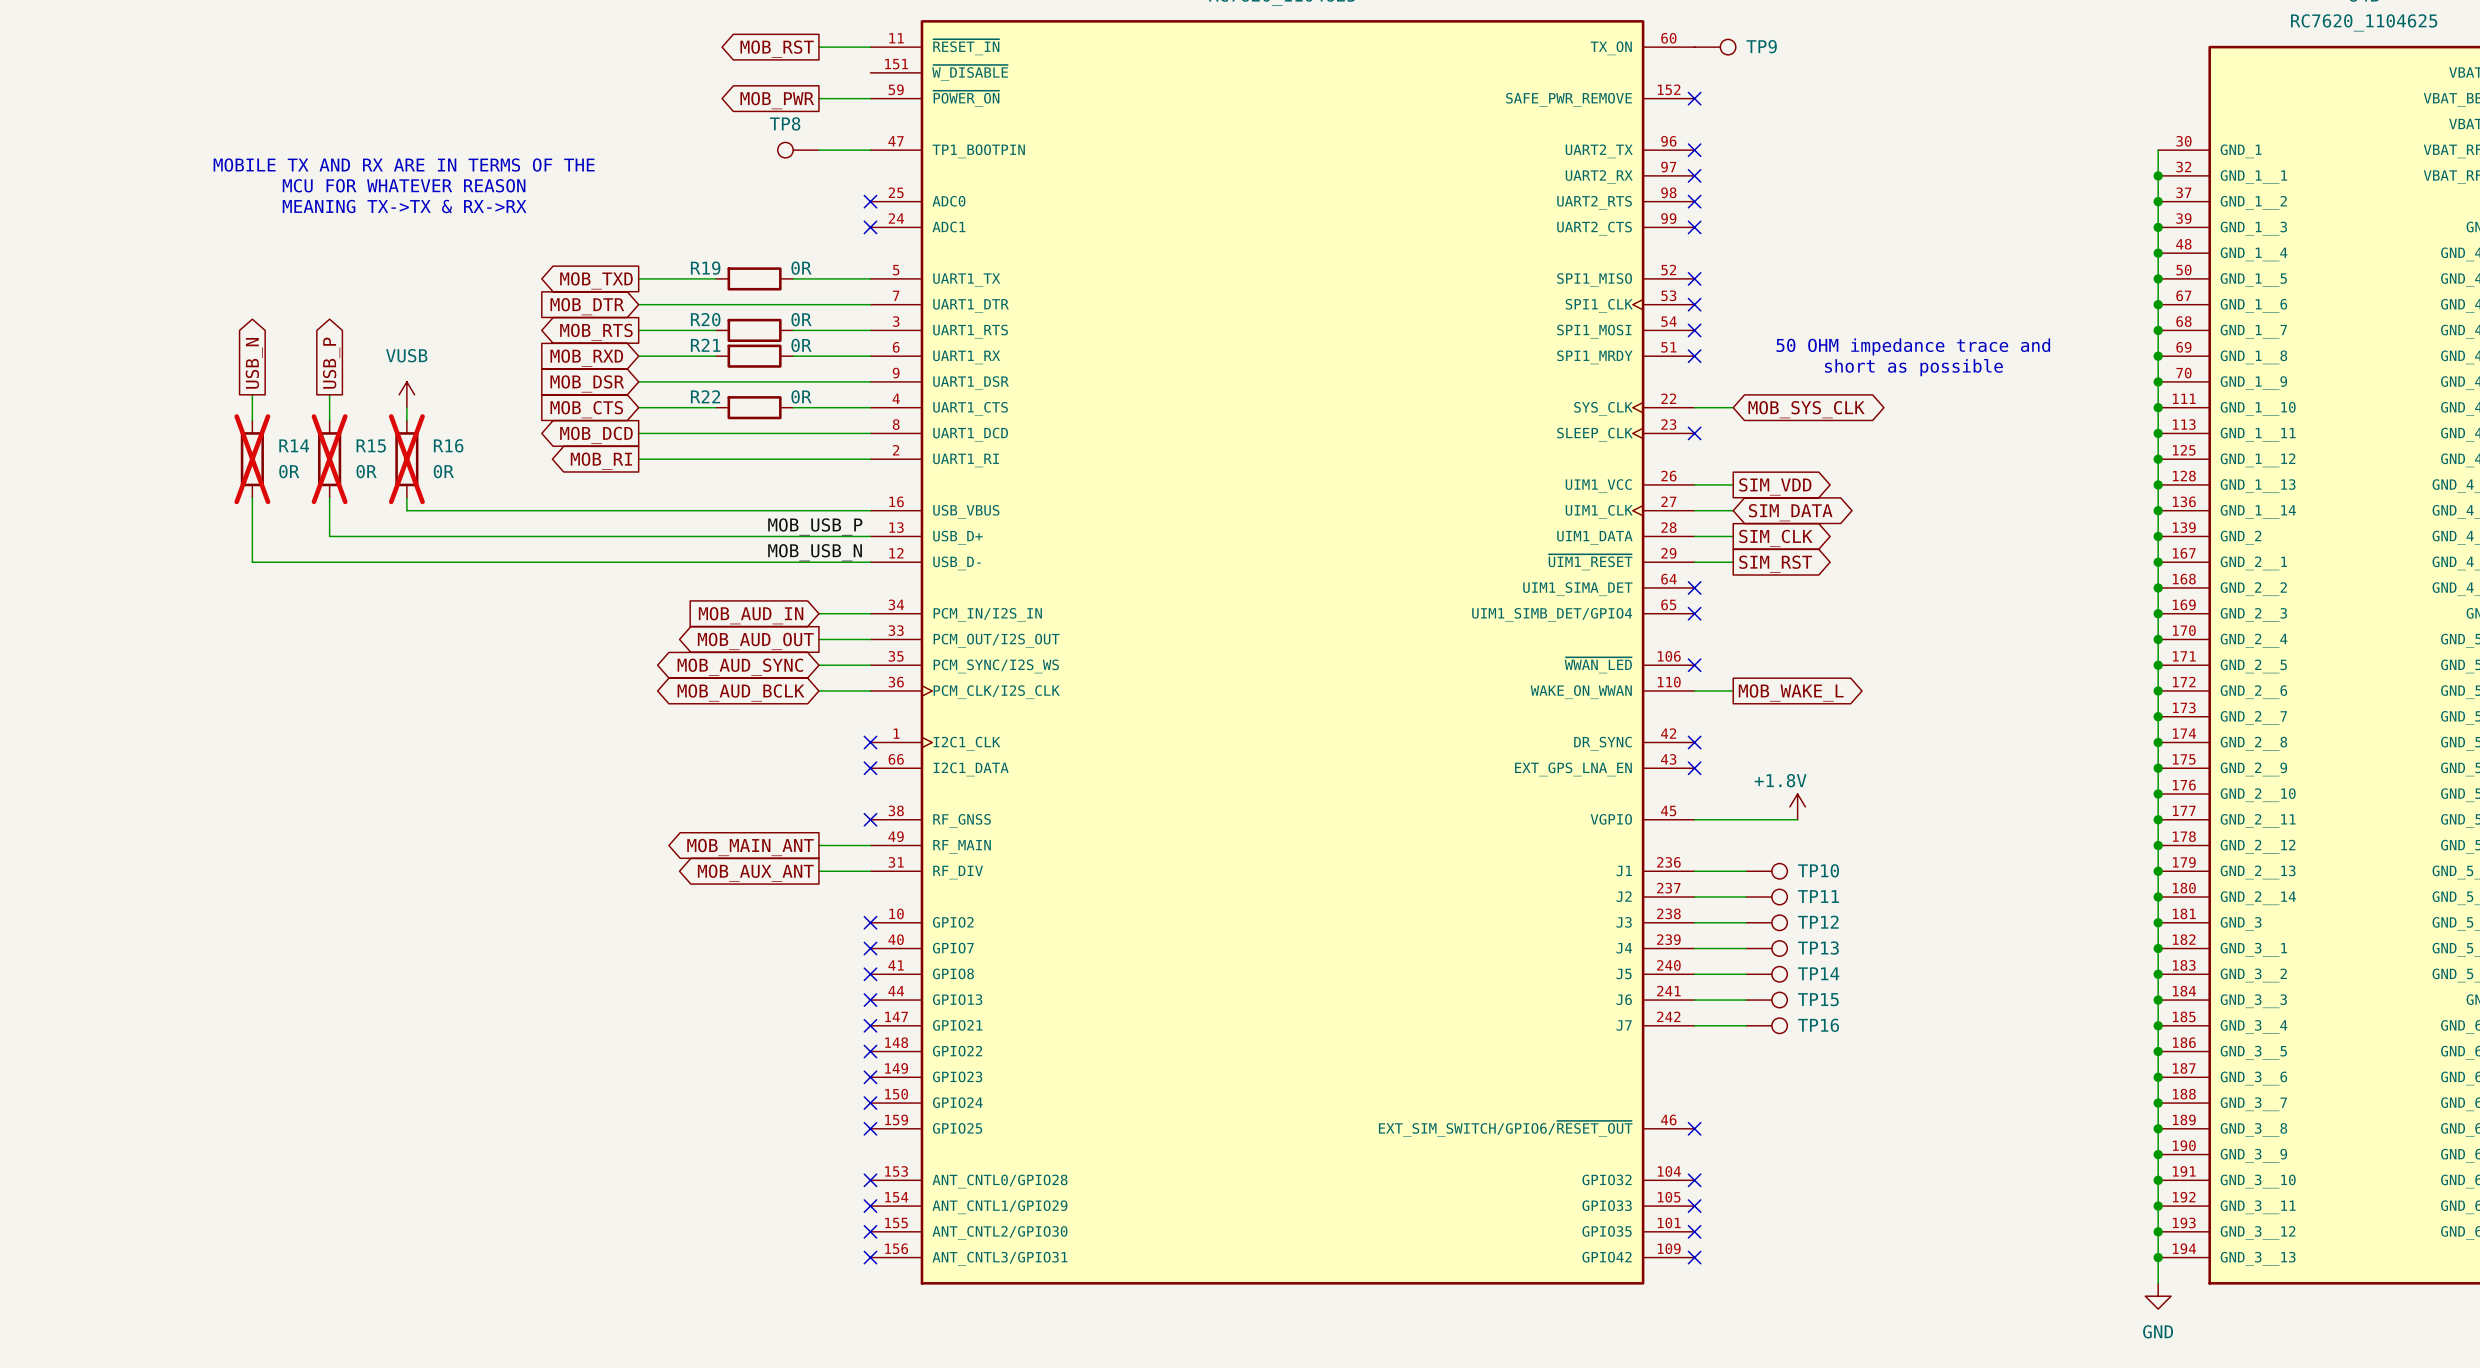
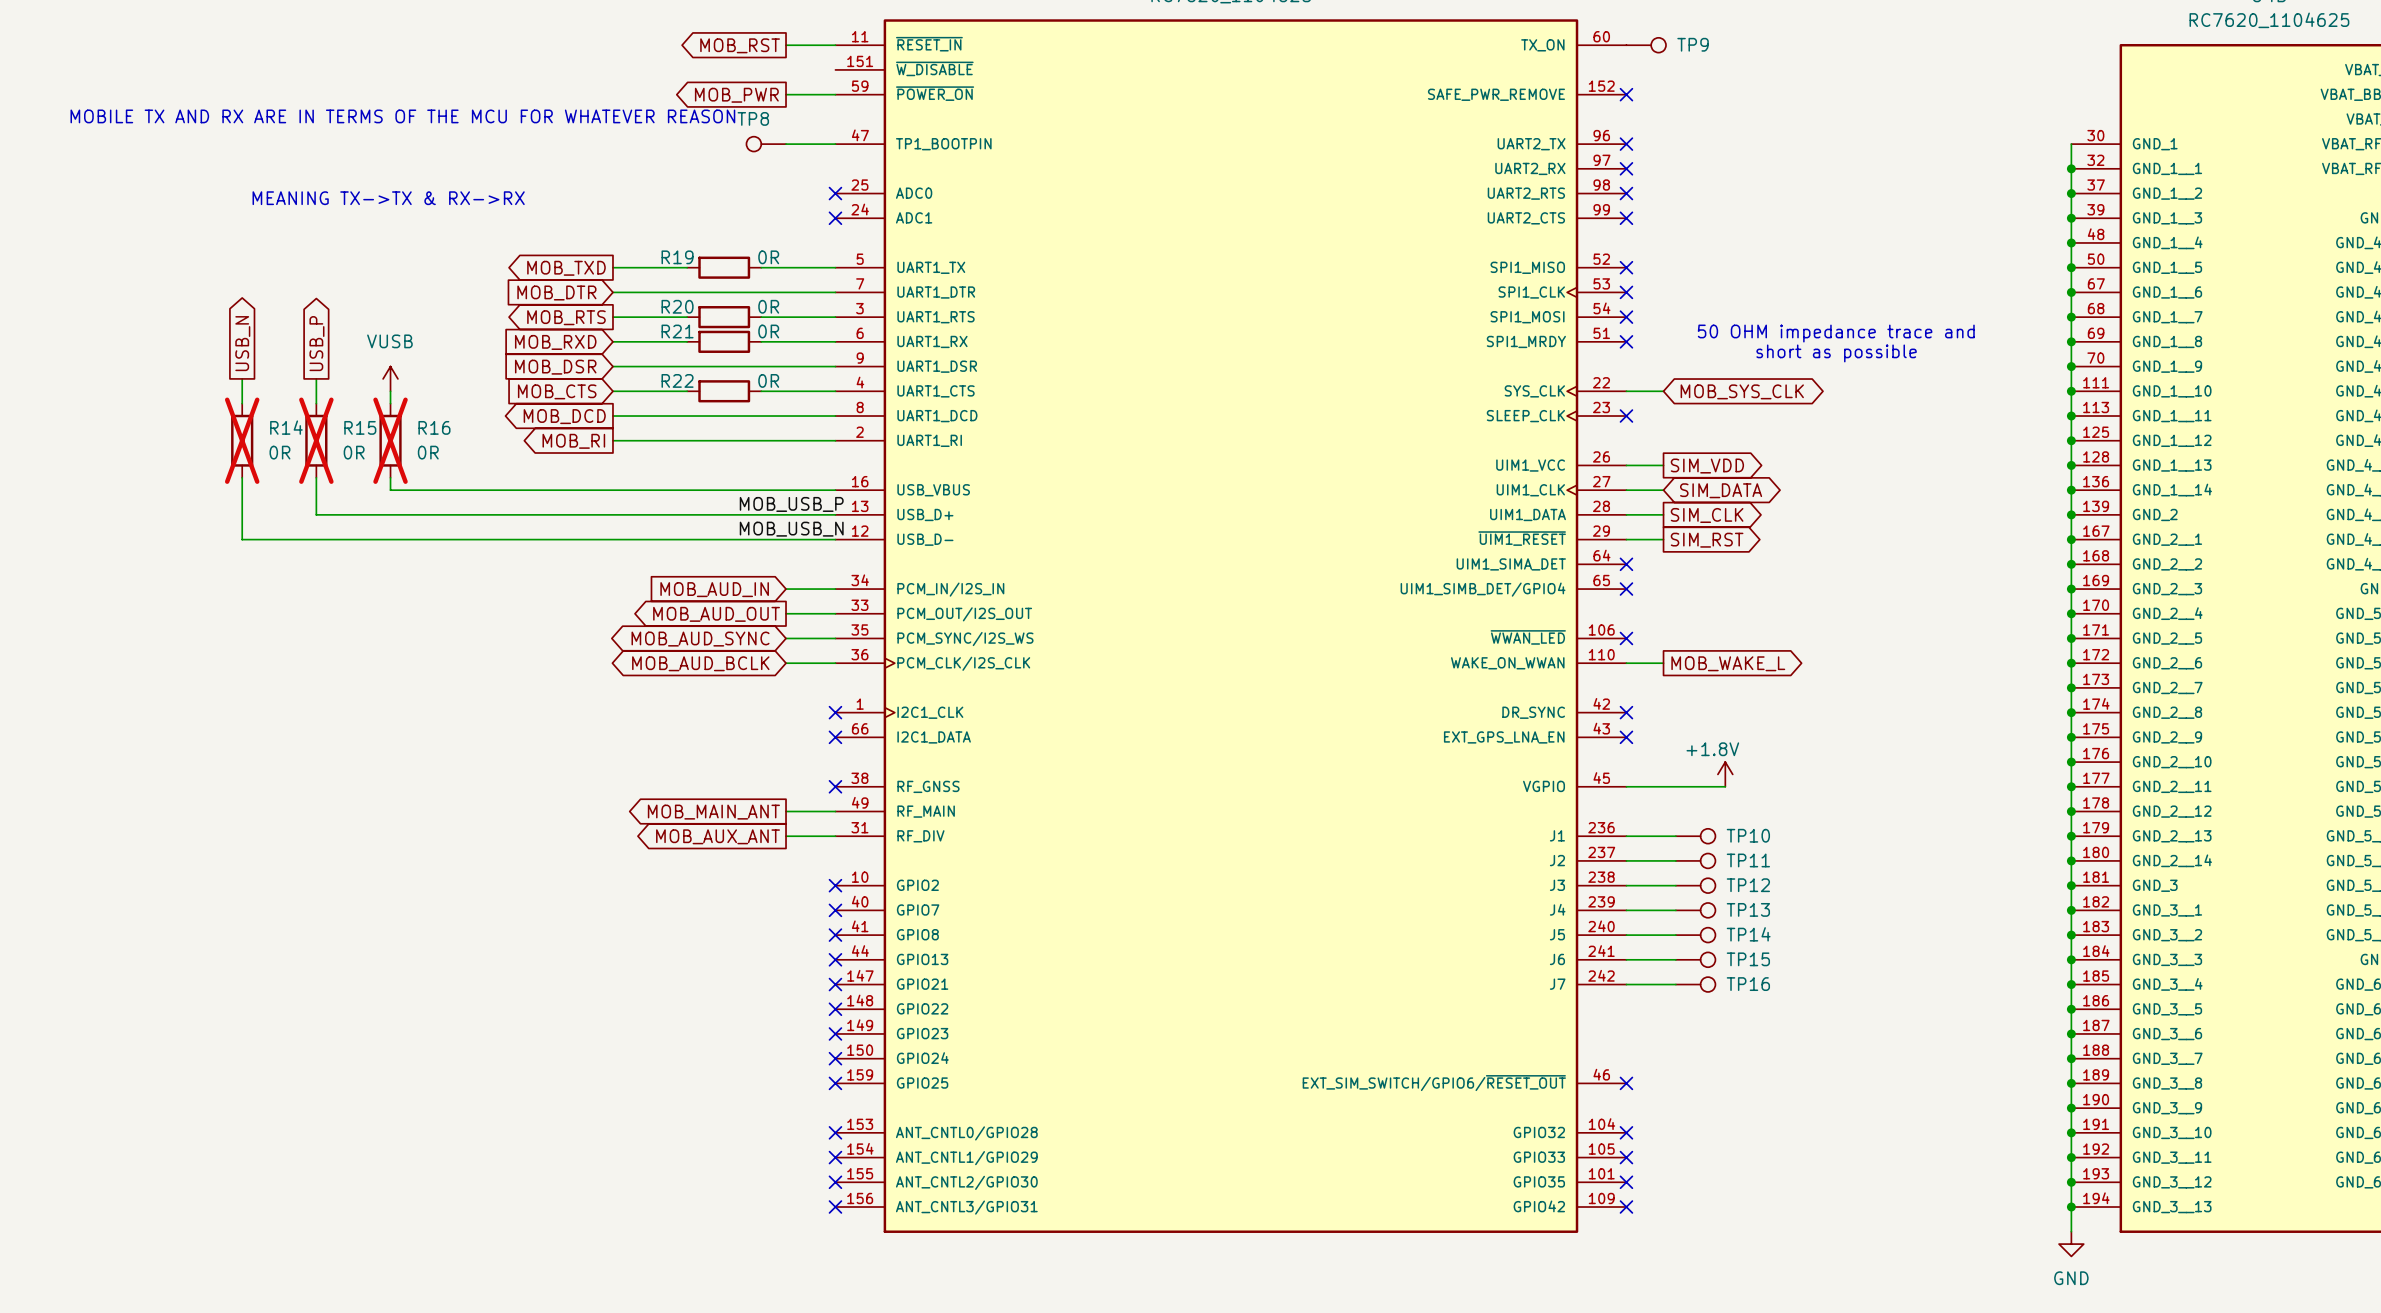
text: none -> MOBILE TX AND RX ARE IN TERMS OF THE MCU FOR WHATEVER REASON (402, 116)
text: MOBILE TX AND RX ARE IN TERMS OF THE (404, 165) -> none
text: MCU FOR WHATEVER REASON (404, 185) -> none

